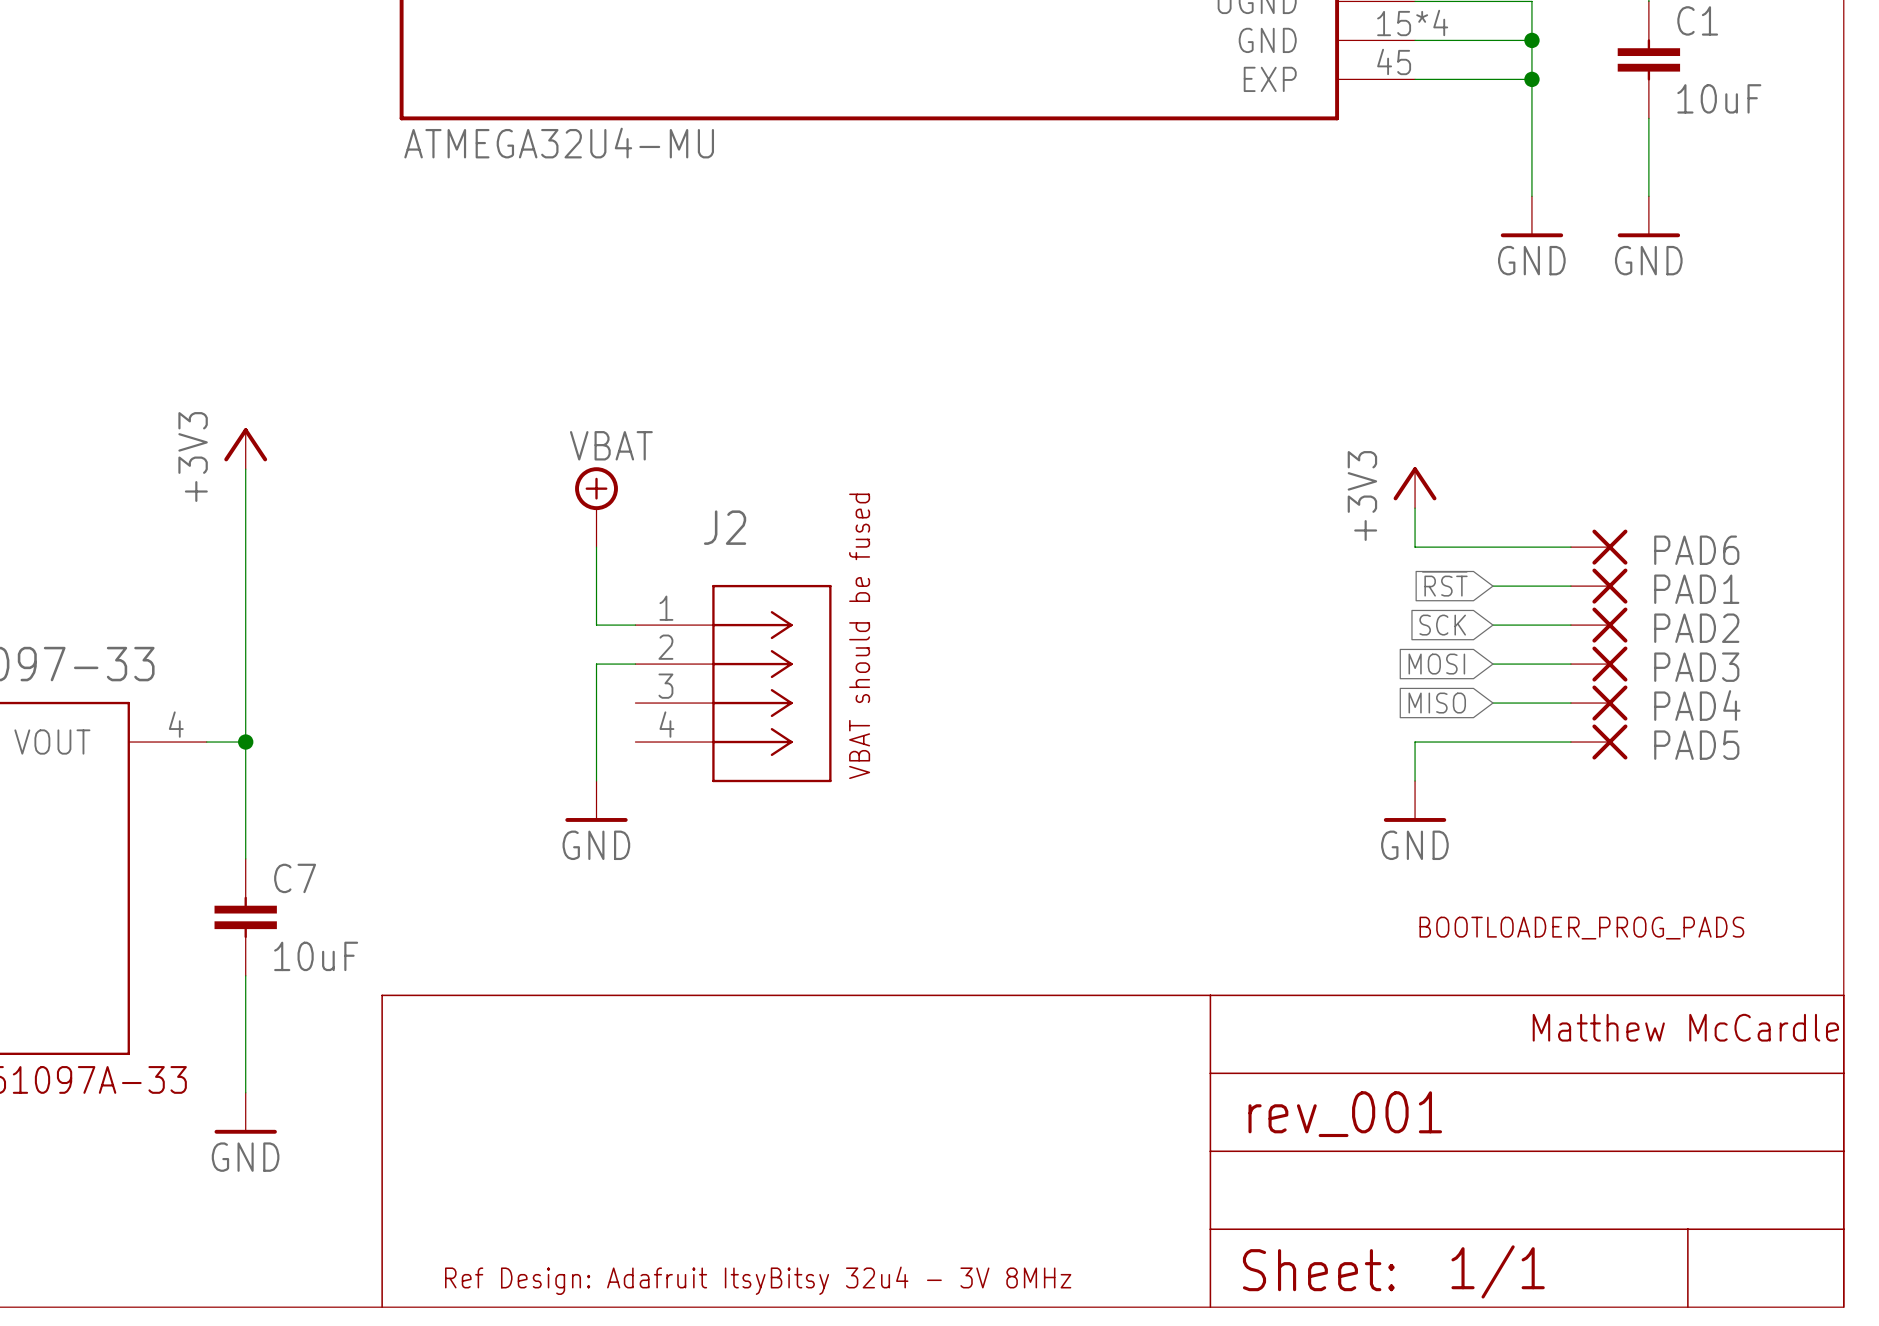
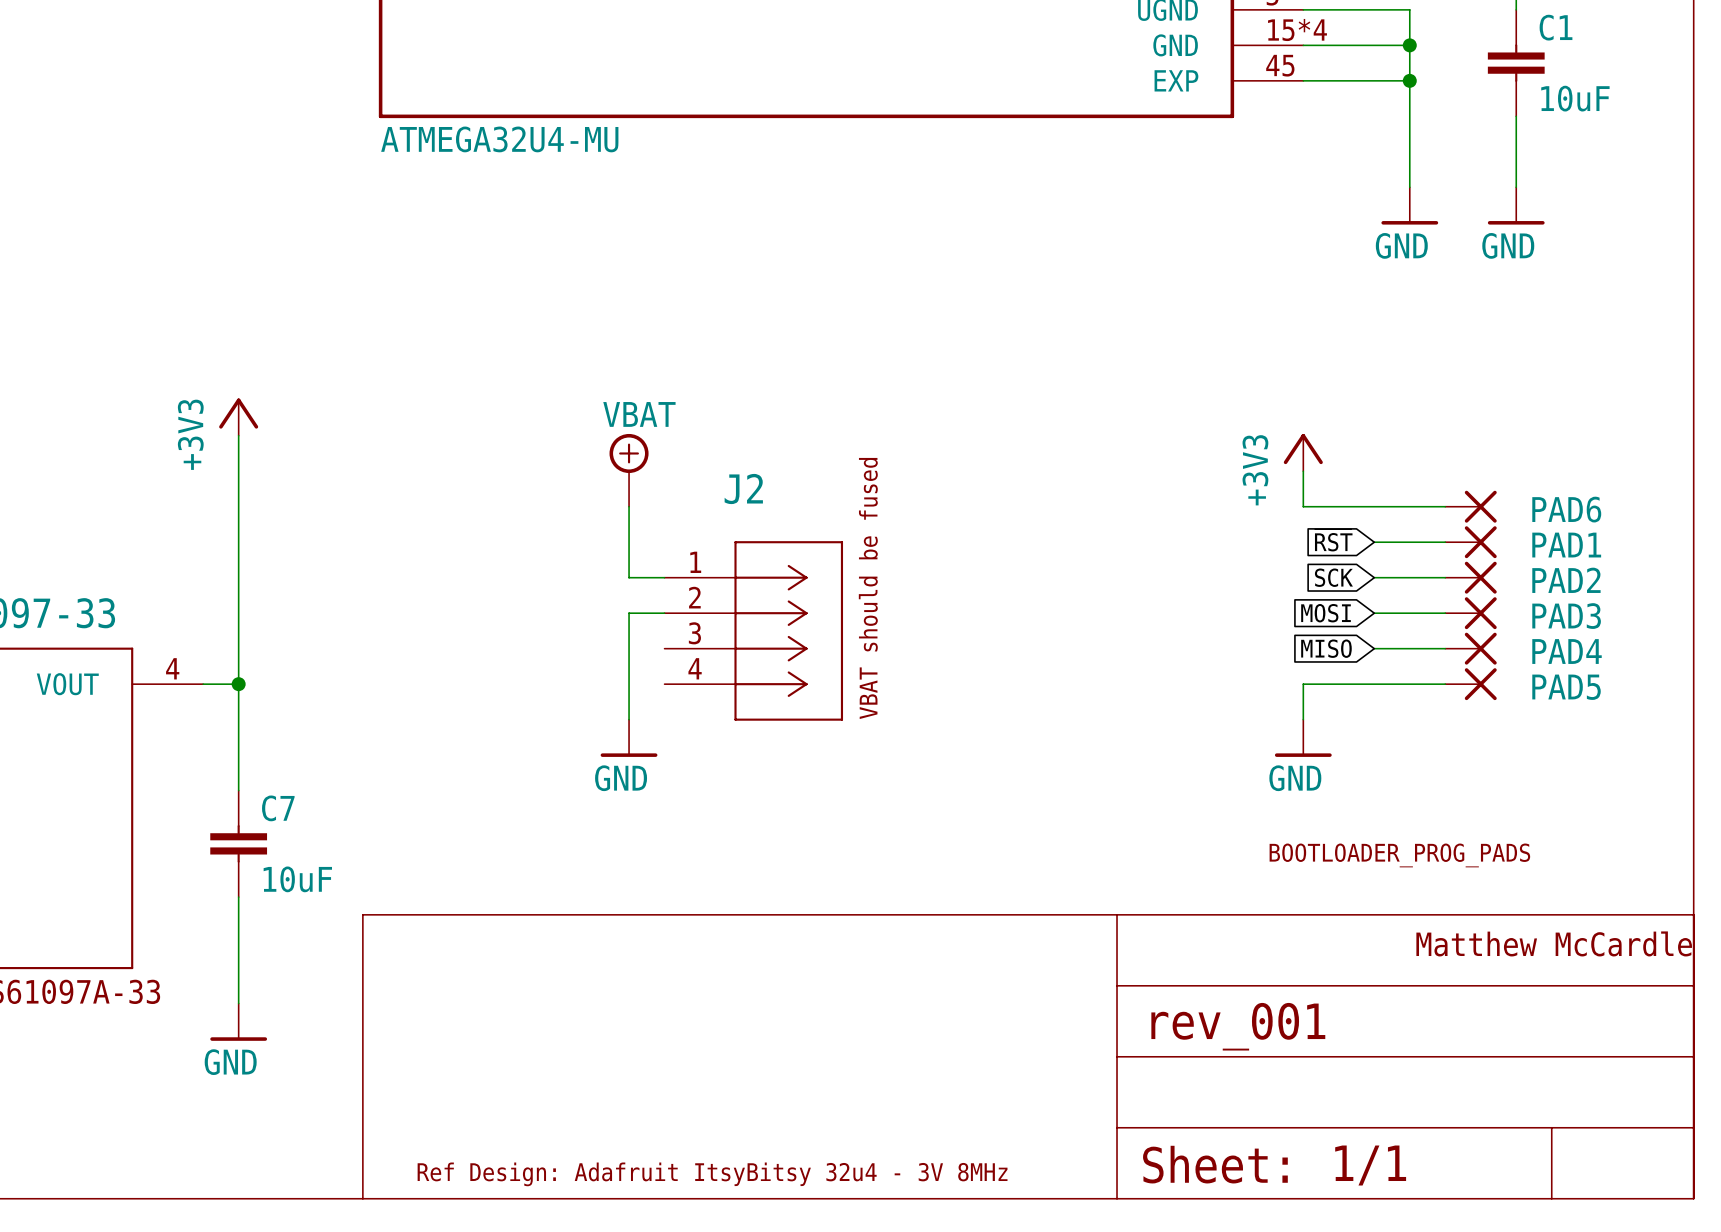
power symbol position: VBAT (596, 507) -> VBAT (629, 470)
wire: (596, 547) (596, 625) (635, 625) -> (629, 506) (629, 577) (664, 577)
text position: VBAT should be fused (859, 636) -> VBAT should be fused (868, 588)
wire: (635, 664) (596, 664) (596, 780) -> (664, 613) (629, 613) (629, 719)
J2 position: (733, 683) -> (753, 630)
power symbol position: GND (596, 801) -> GND (629, 738)
text position: BOOTLOADER_PROG_PADS (1581, 928) -> BOOTLOADER_PROG_PADS (1399, 855)

